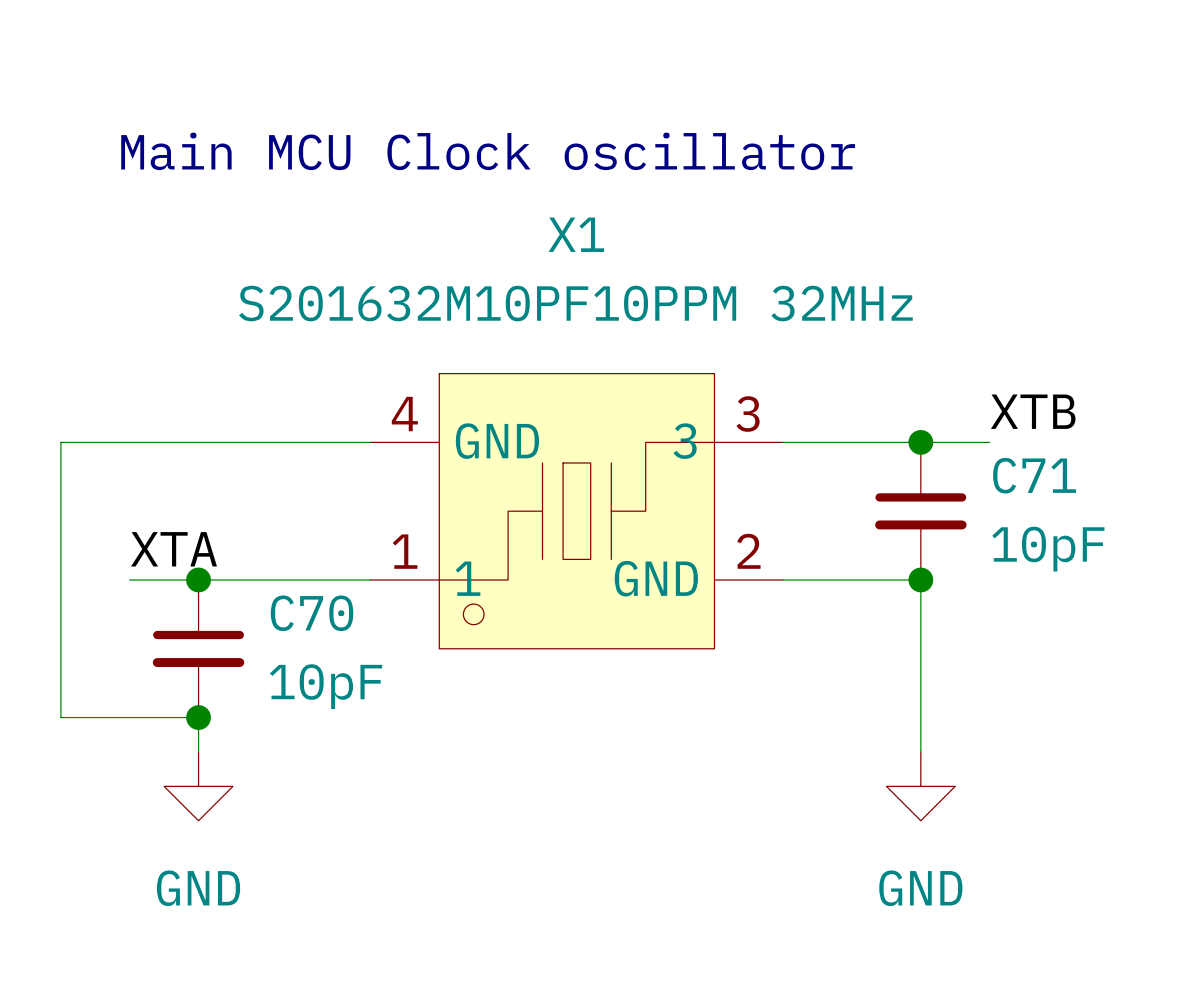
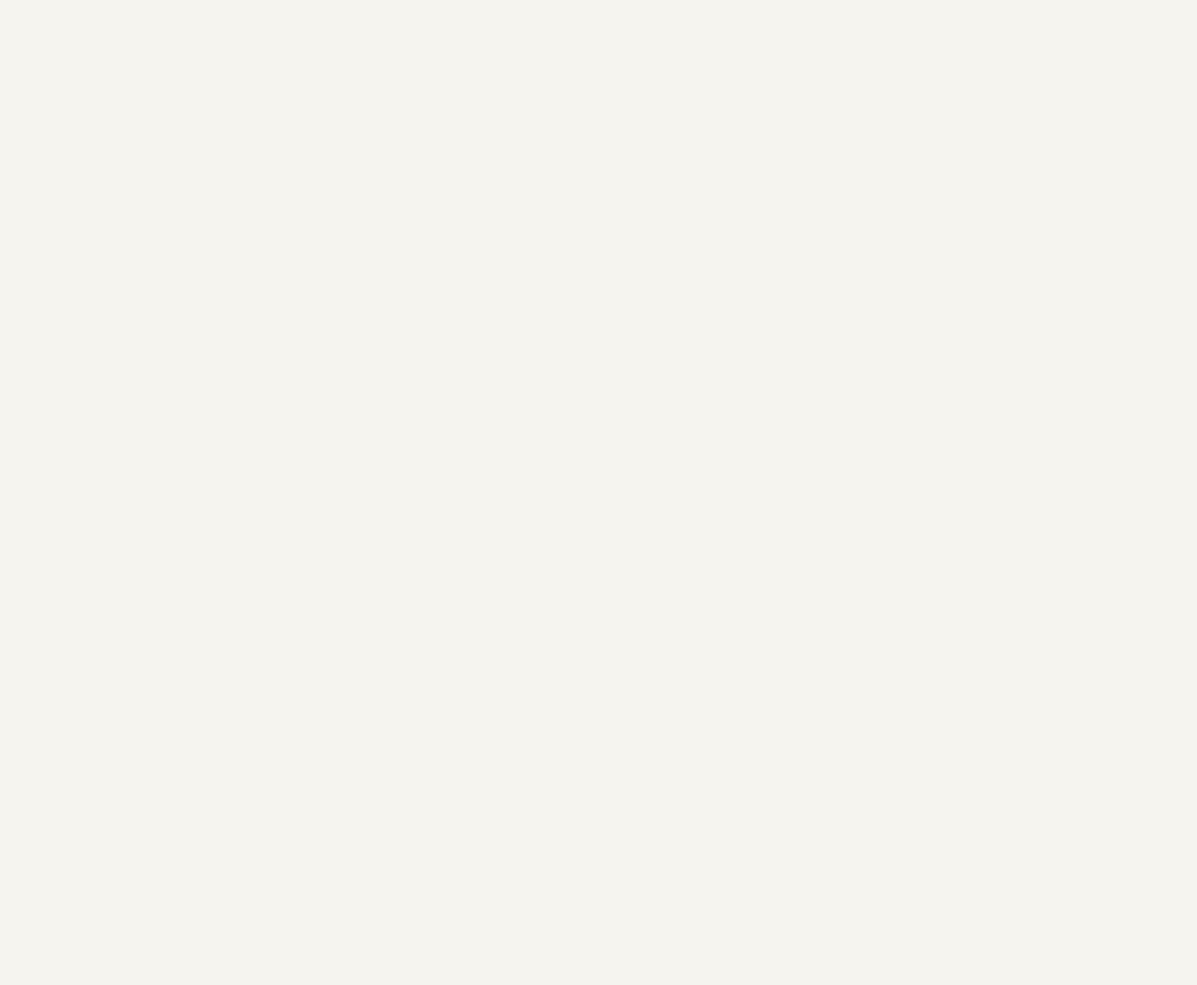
text: Main MCU Clock oscillator (488, 151) -> none
label: XTB (1033, 411) -> none
wire: (370, 442) (60, 442) (60, 717) (198, 717) (198, 751) -> none
wire: (783, 442) (989, 442) -> none
junction: (920, 442) -> none
X1: S201632M10PF10PPM 32MHz (576, 511) -> none
C71: 10pF (920, 511) -> none
label: XTA (174, 549) -> none
wire: (129, 579) (370, 579) -> none
junction: (198, 579) -> none
wire: (783, 579) (920, 579) (920, 751) -> none
junction: (920, 579) -> none
C70: 10pF (198, 648) -> none
junction: (198, 717) -> none
power symbol: GND (198, 786) -> none
power symbol: GND (920, 786) -> none

